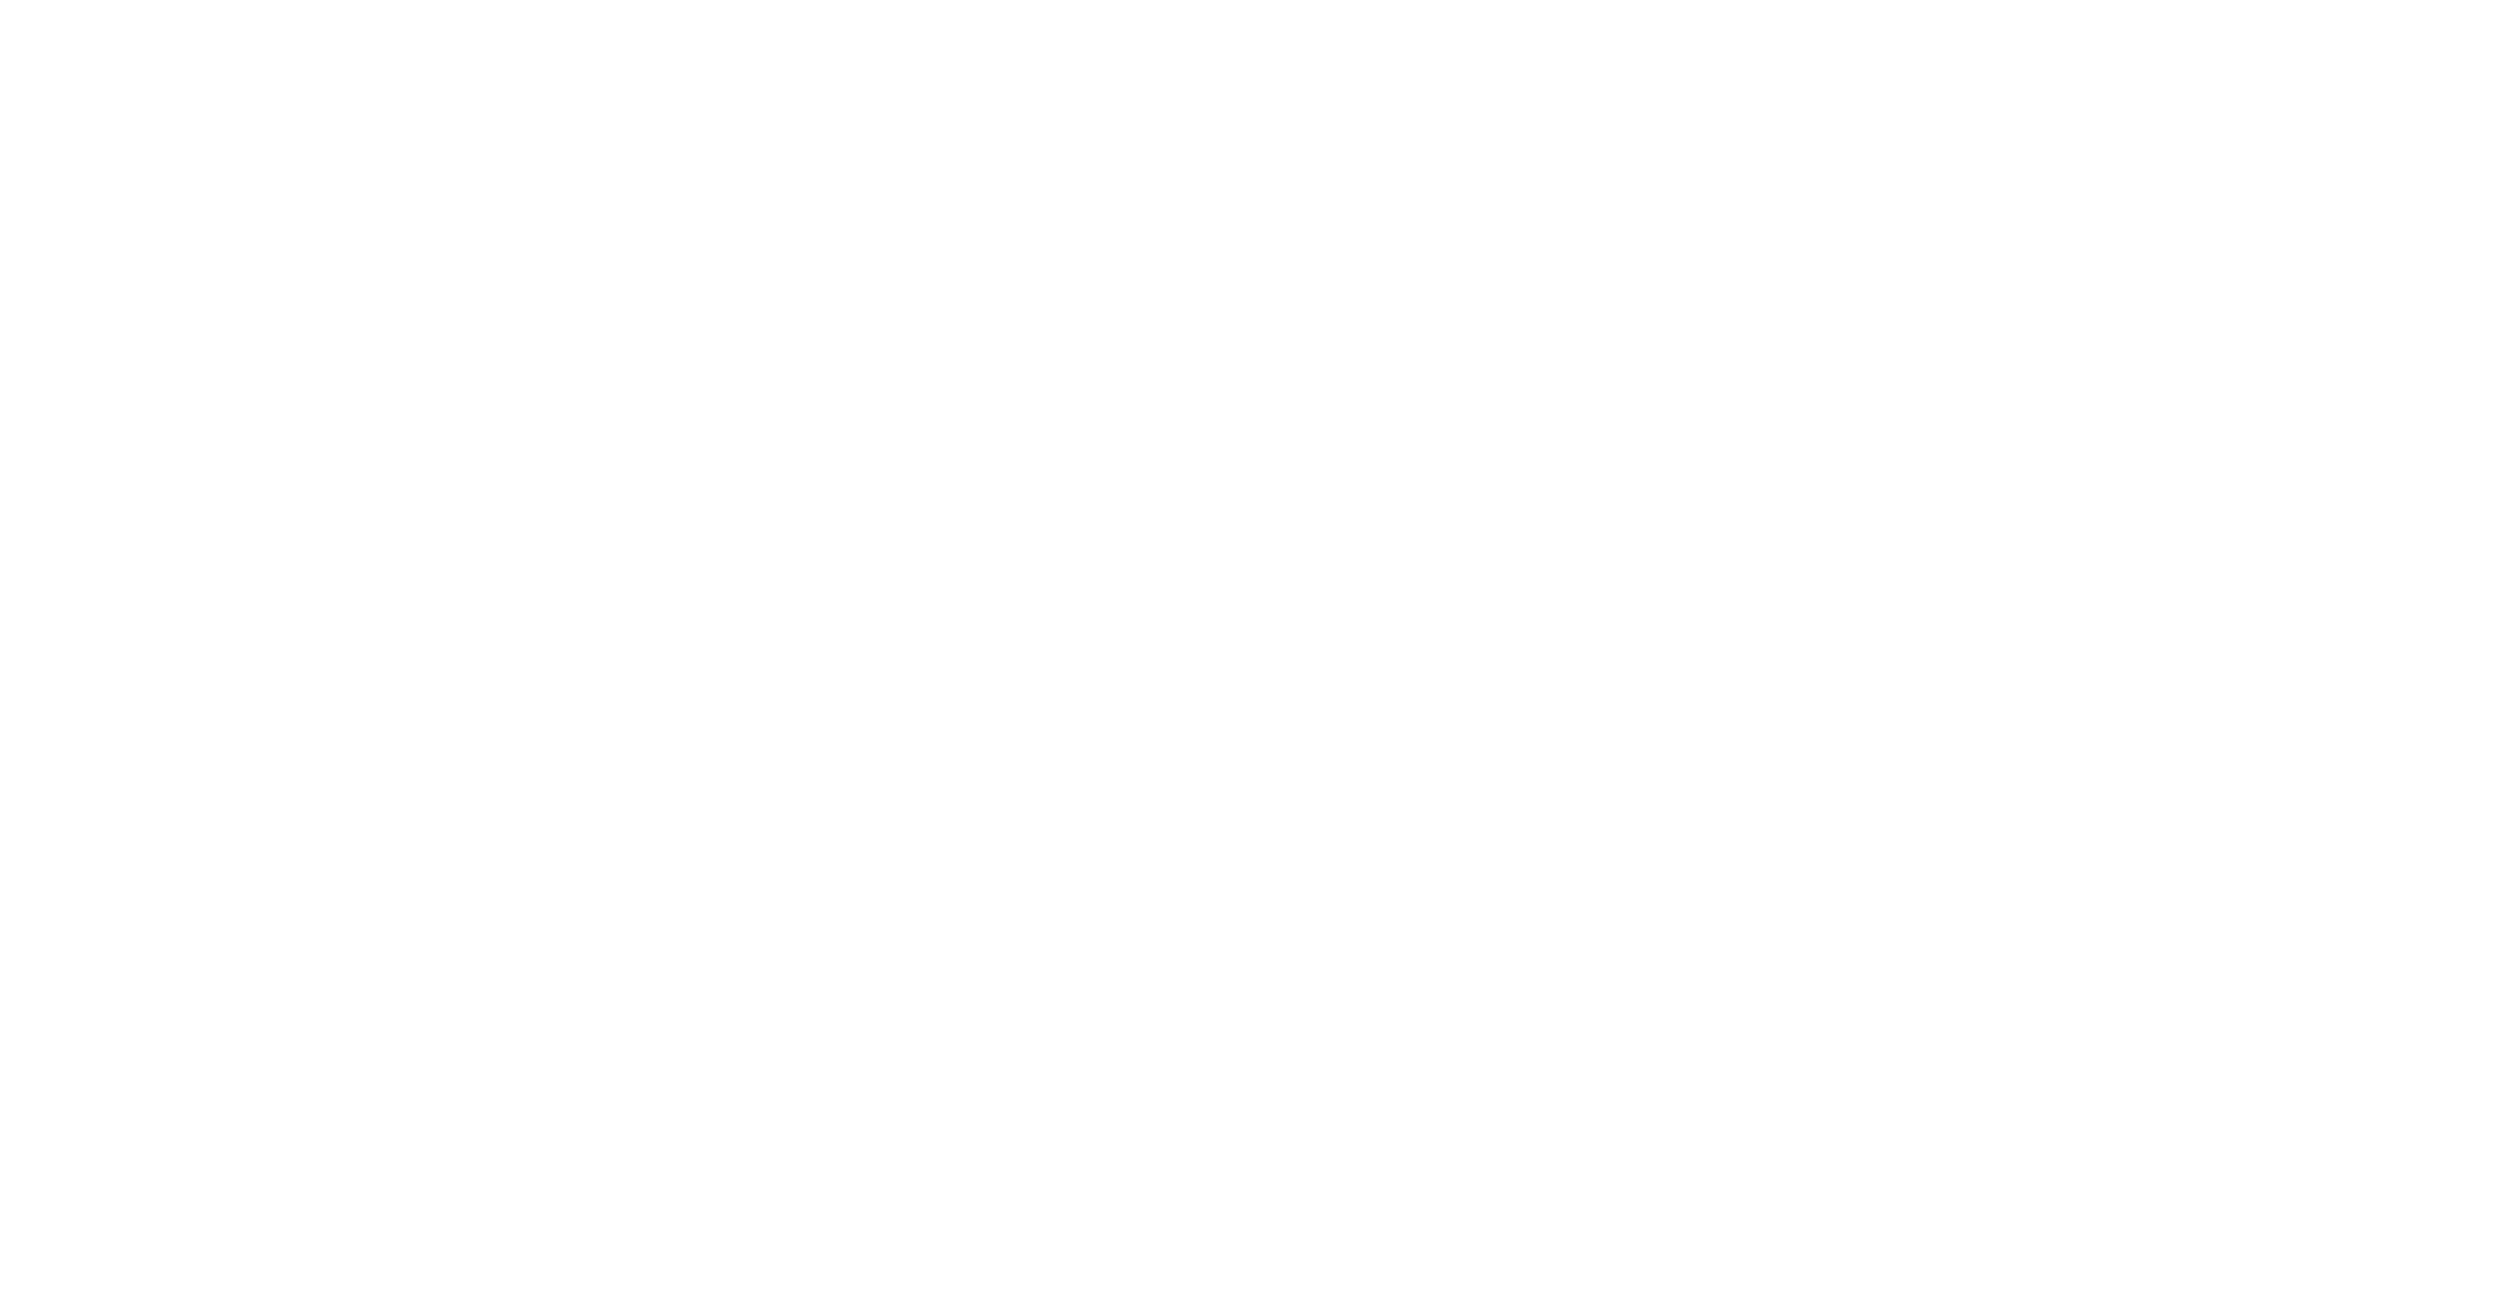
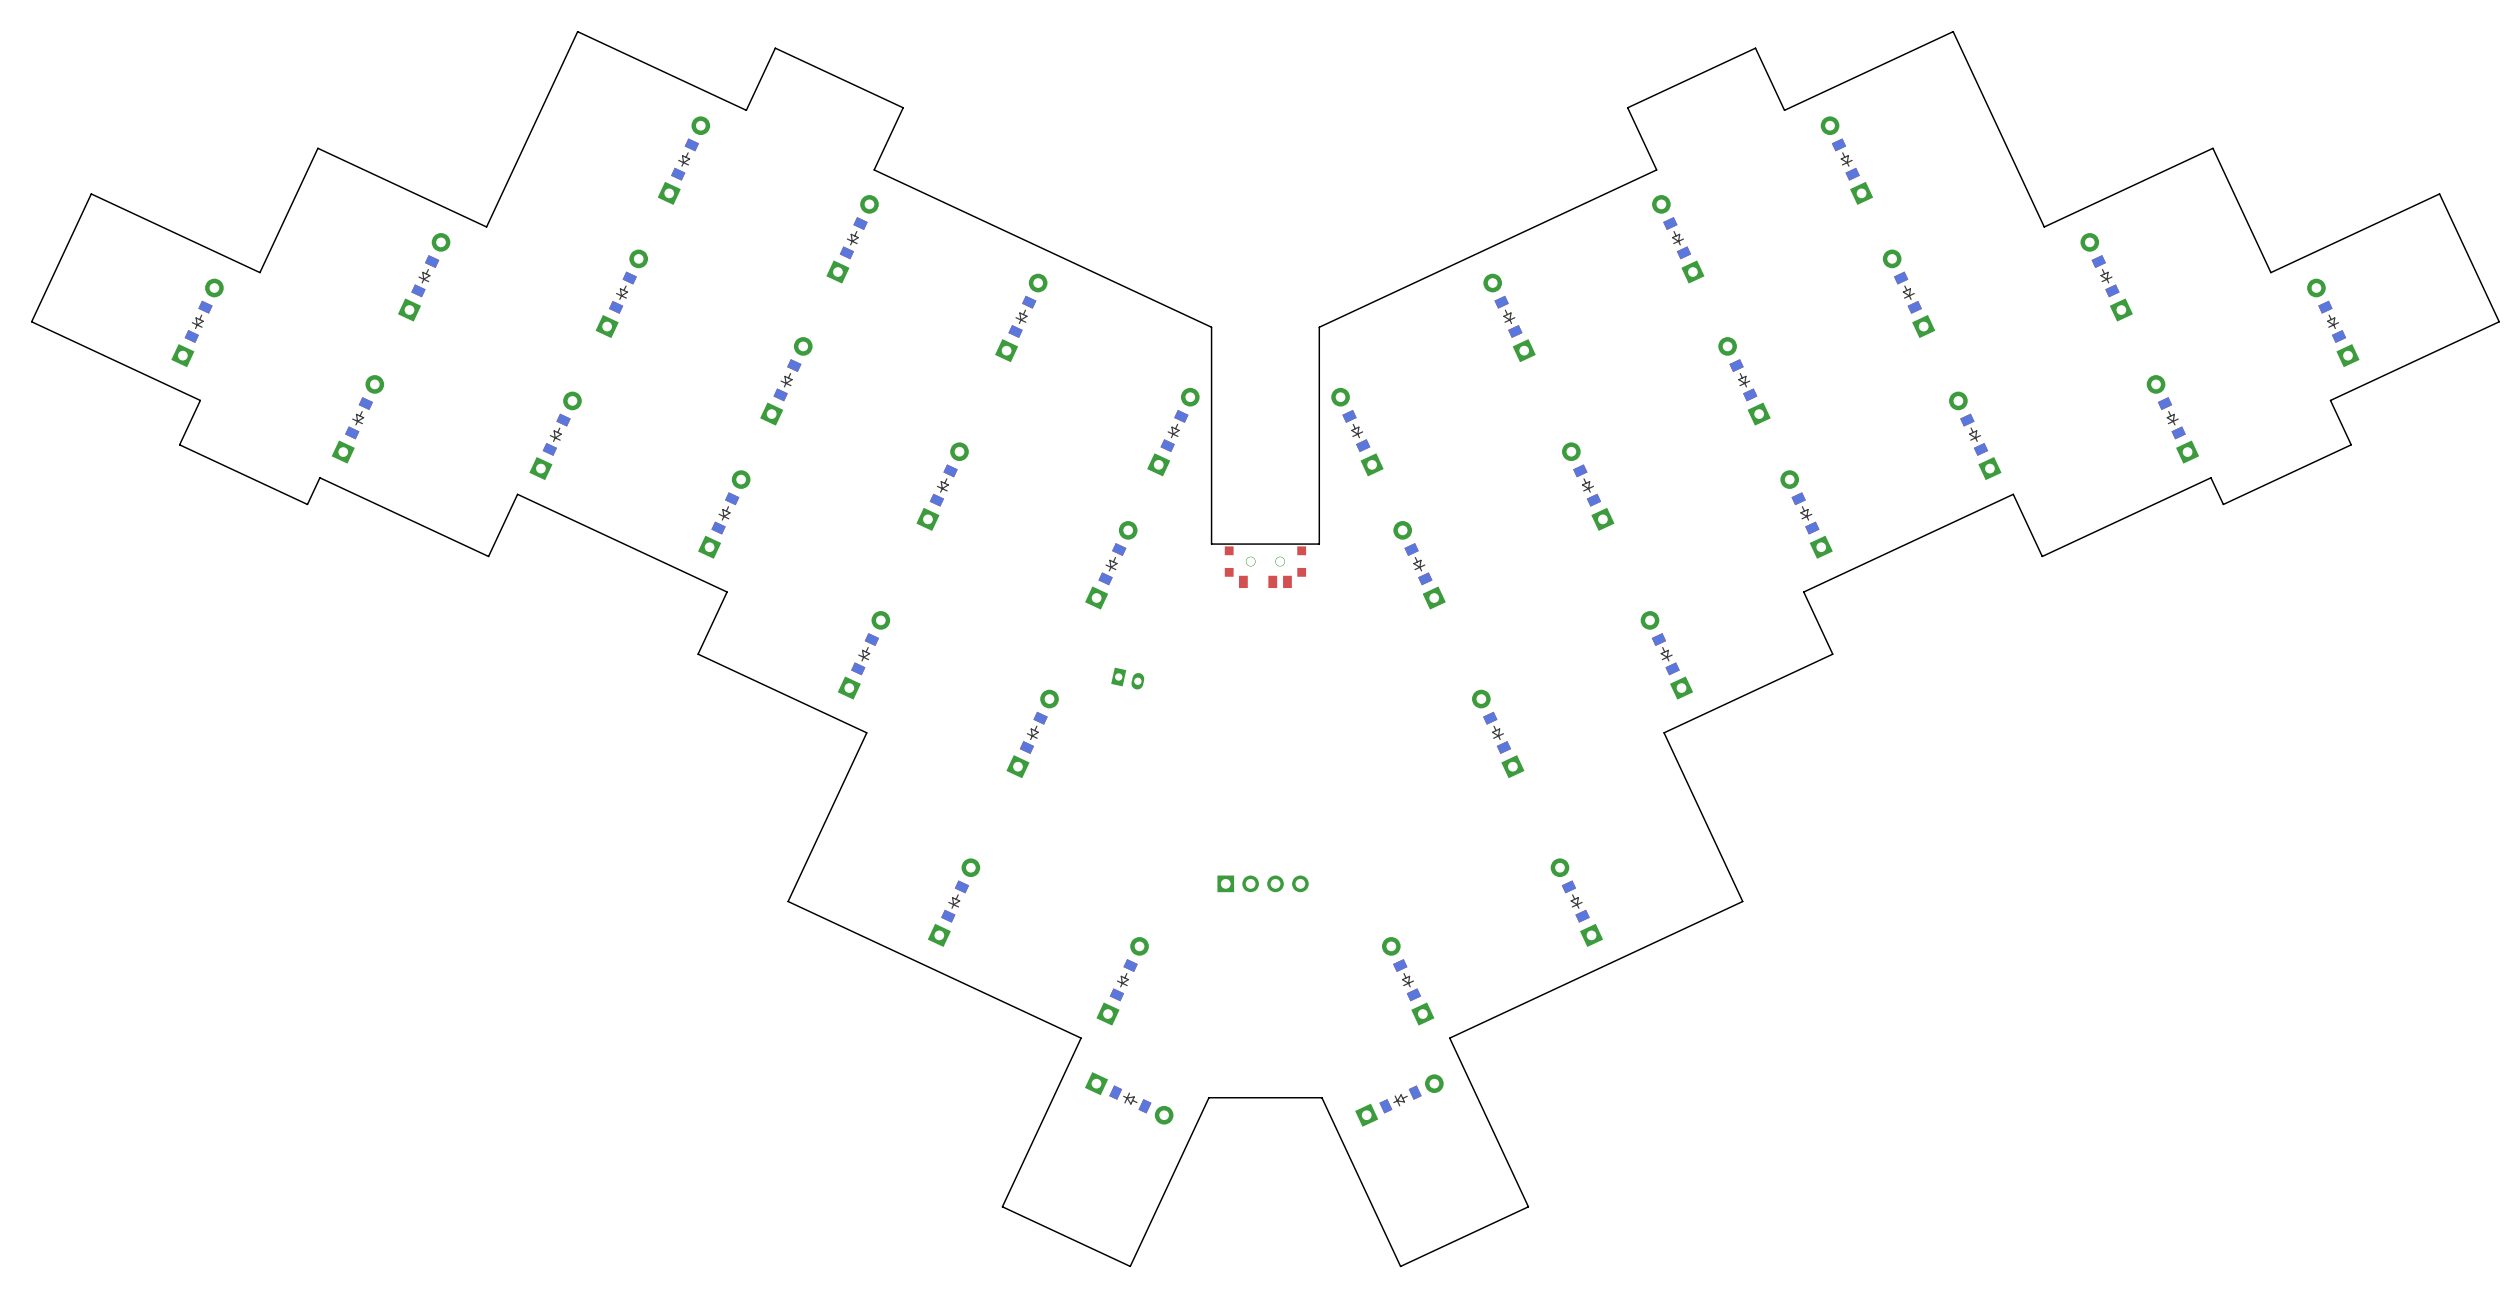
board edge: none -> (1953, 31) (1784, 110) (1755, 48) (1627, 107) (1656, 169) (1319, 327) (1319, 544) (1211, 544) (1211, 327) (874, 169) (903, 107) (775, 48) (746, 110) (577, 31) (486, 226) (317, 148) (259, 272) (91, 193) (31, 321) (200, 400) (179, 444) (307, 504) (319, 477) (488, 556) (517, 494) (727, 592) (698, 654) (866, 732) (788, 901) (1081, 1038) (1002, 1206) (1130, 1266) (1208, 1097) (1321, 1097) (1400, 1266) (1528, 1206) (1449, 1038) (1742, 901) (1664, 732) (1832, 654) (1803, 592) (2013, 494) (2042, 556) (2210, 477) (2223, 504) (2351, 444) (2330, 400) (2499, 321) (2439, 193) (2270, 272) (2212, 148) (2044, 226) (1953, 31)
part: none -> (683, 160)
part: none -> (1846, 160)
part: none -> (852, 239)
part: none -> (1678, 239)
part: none -> (424, 277)
part: none -> (2106, 277)
part: none -> (621, 293)
part: none -> (1909, 293)
part: none -> (1021, 317)
part: none -> (1509, 317)
part: none -> (197, 322)
part: none -> (2333, 322)
part: none -> (786, 381)
part: none -> (1744, 381)
part: none -> (357, 419)
part: none -> (2172, 419)
part: none -> (1173, 432)
part: none -> (1357, 432)
part: none -> (555, 435)
part: none -> (1975, 435)
part: none -> (942, 486)
part: none -> (1588, 486)
part: none -> (724, 514)
part: none -> (1806, 514)
part: none -> (1111, 565)
part: none -> (1419, 565)
part: none -> (1265, 567)
part: none -> (863, 655)
part: none -> (1666, 655)
part: none -> (1127, 678)
part: none -> (1032, 734)
part: none -> (1498, 734)
part: none -> (1263, 883)
part: none -> (953, 902)
part: none -> (1576, 902)
part: none -> (1122, 981)
part: none -> (1408, 981)
part: none -> (1129, 1098)
part: none -> (1399, 1100)

